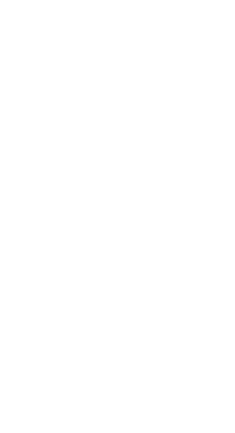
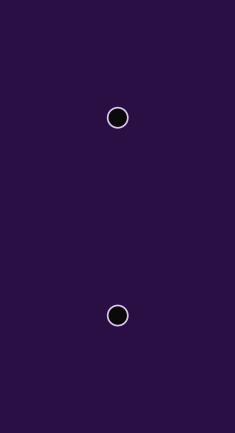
part: none -> (117, 117)
part: none -> (117, 315)

